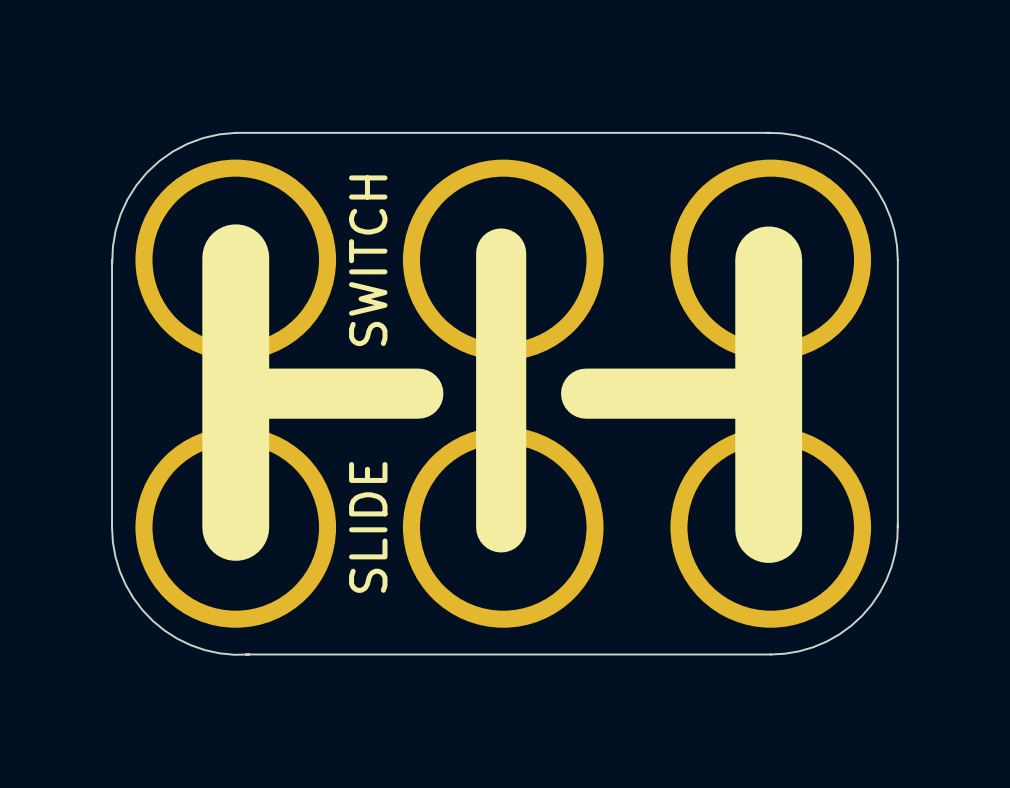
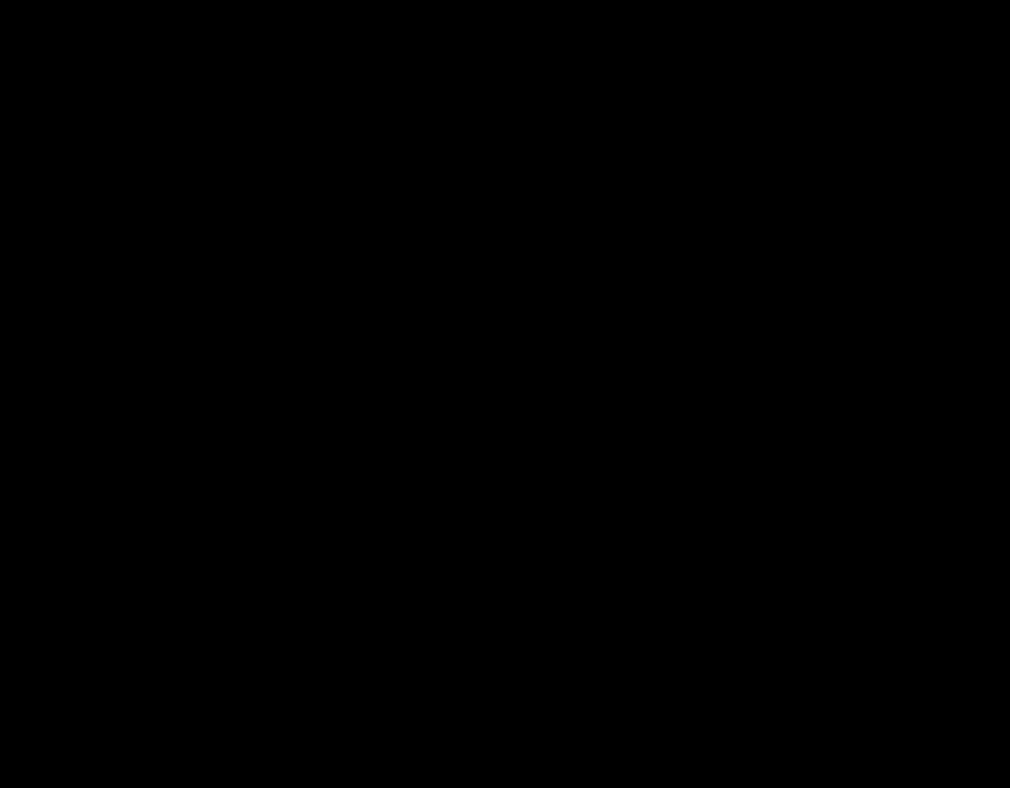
part: (504, 393) -> none

